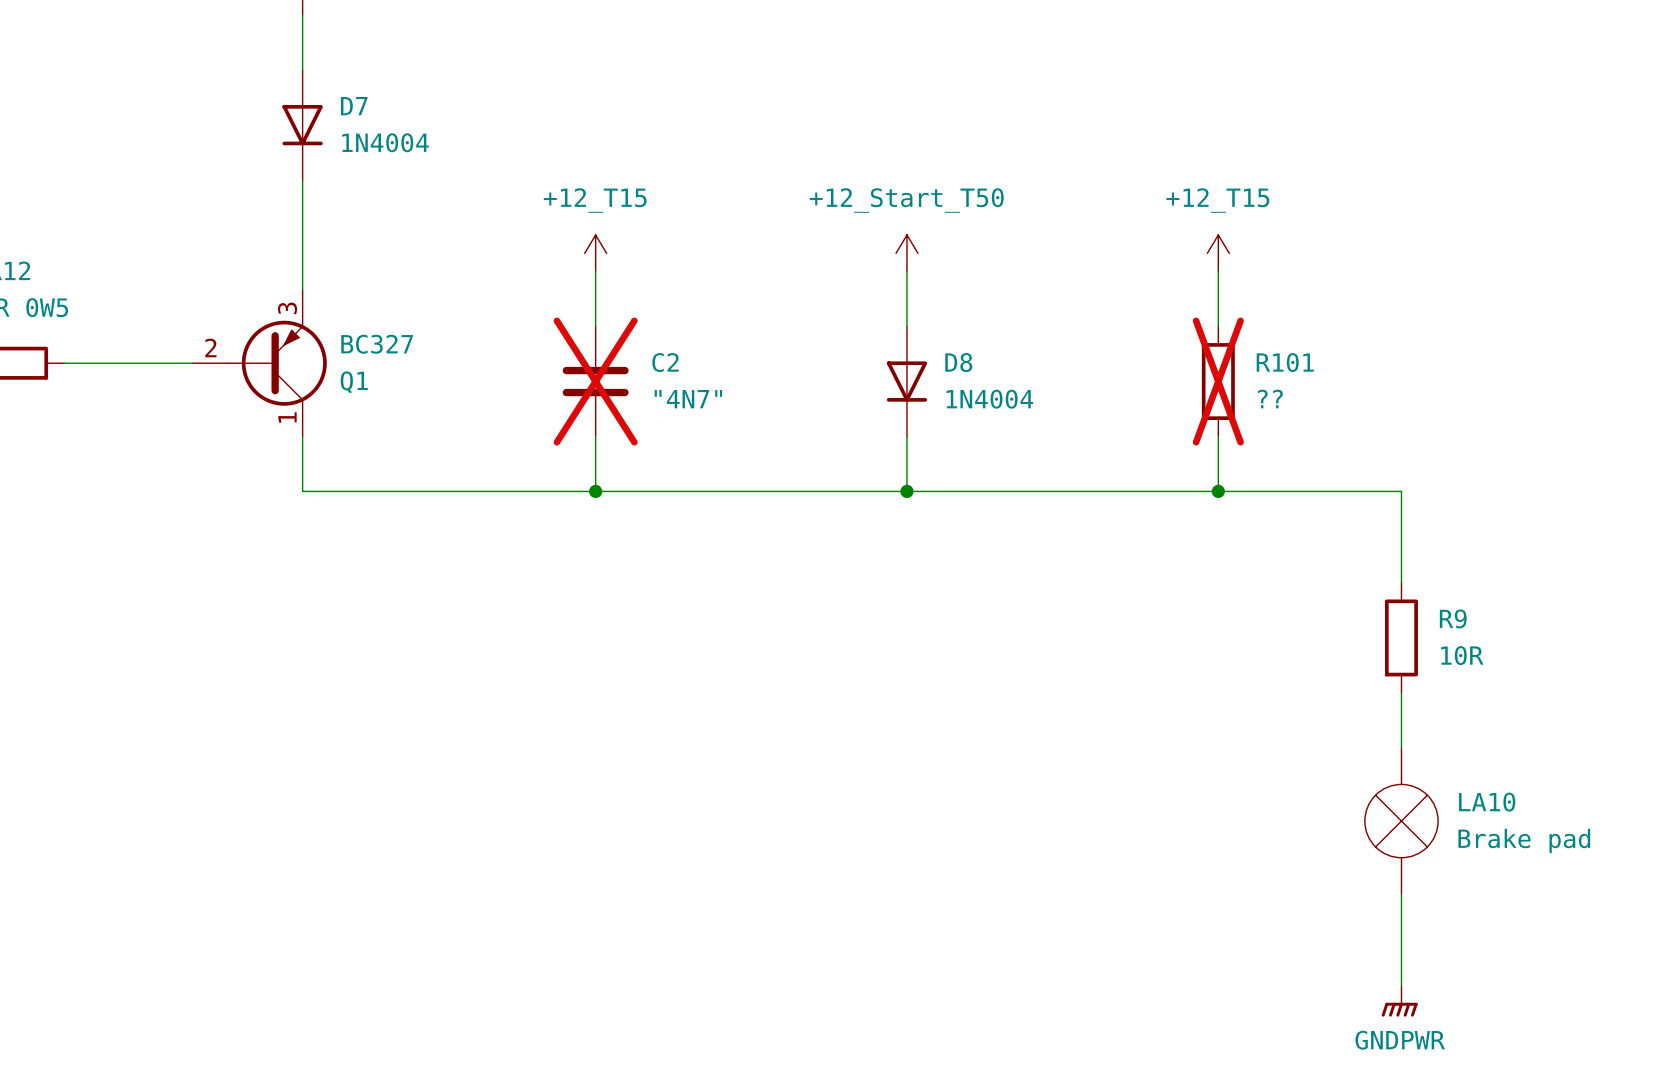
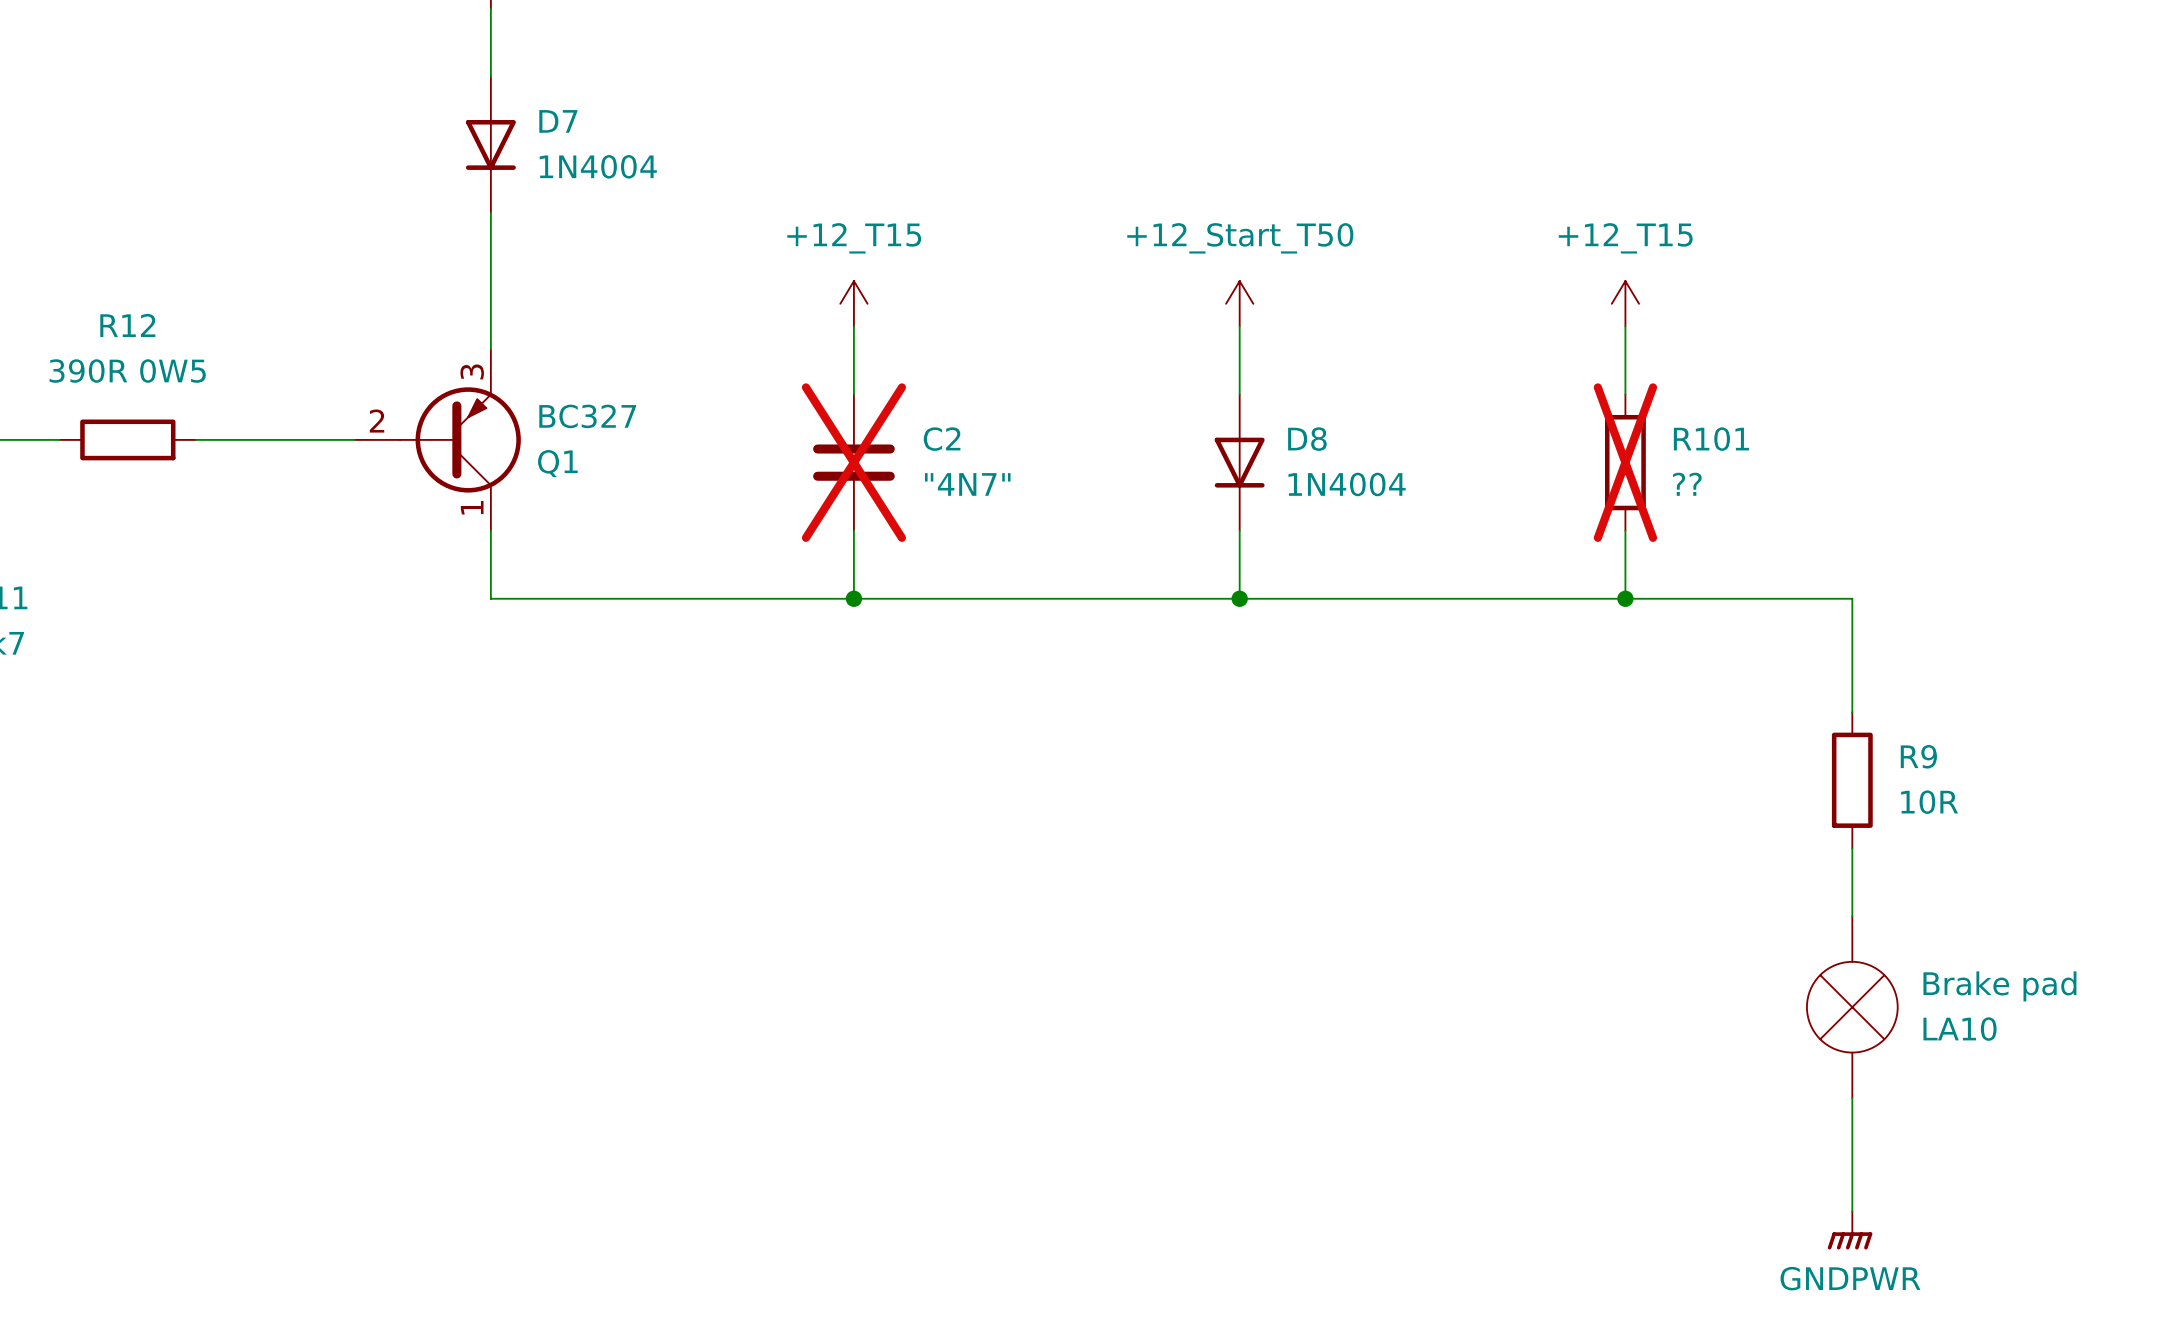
LA10 name position: LA10 (1487, 802) -> LA10 (1960, 1029)
LA10 value position: Brake pad (1524, 840) -> Brake pad (1999, 986)

